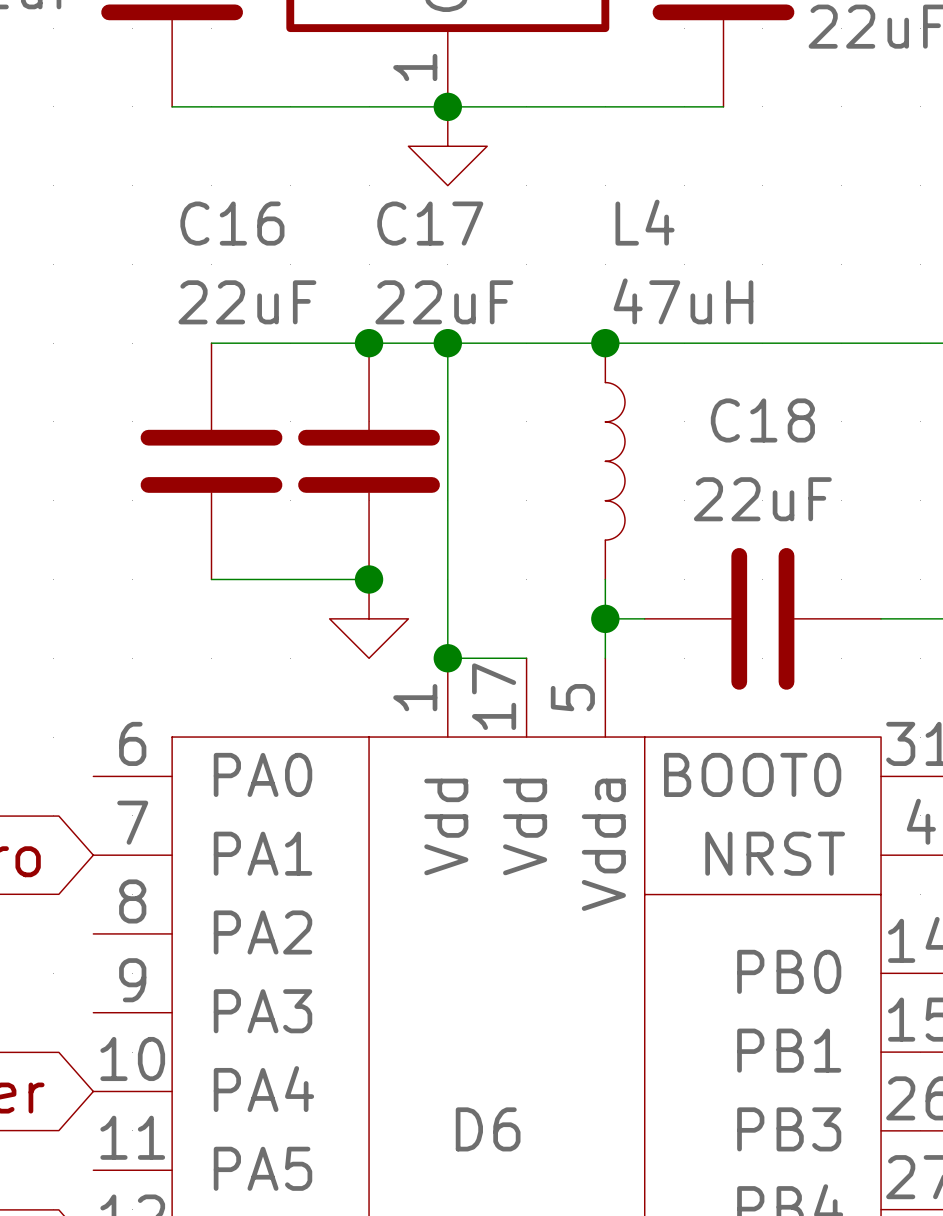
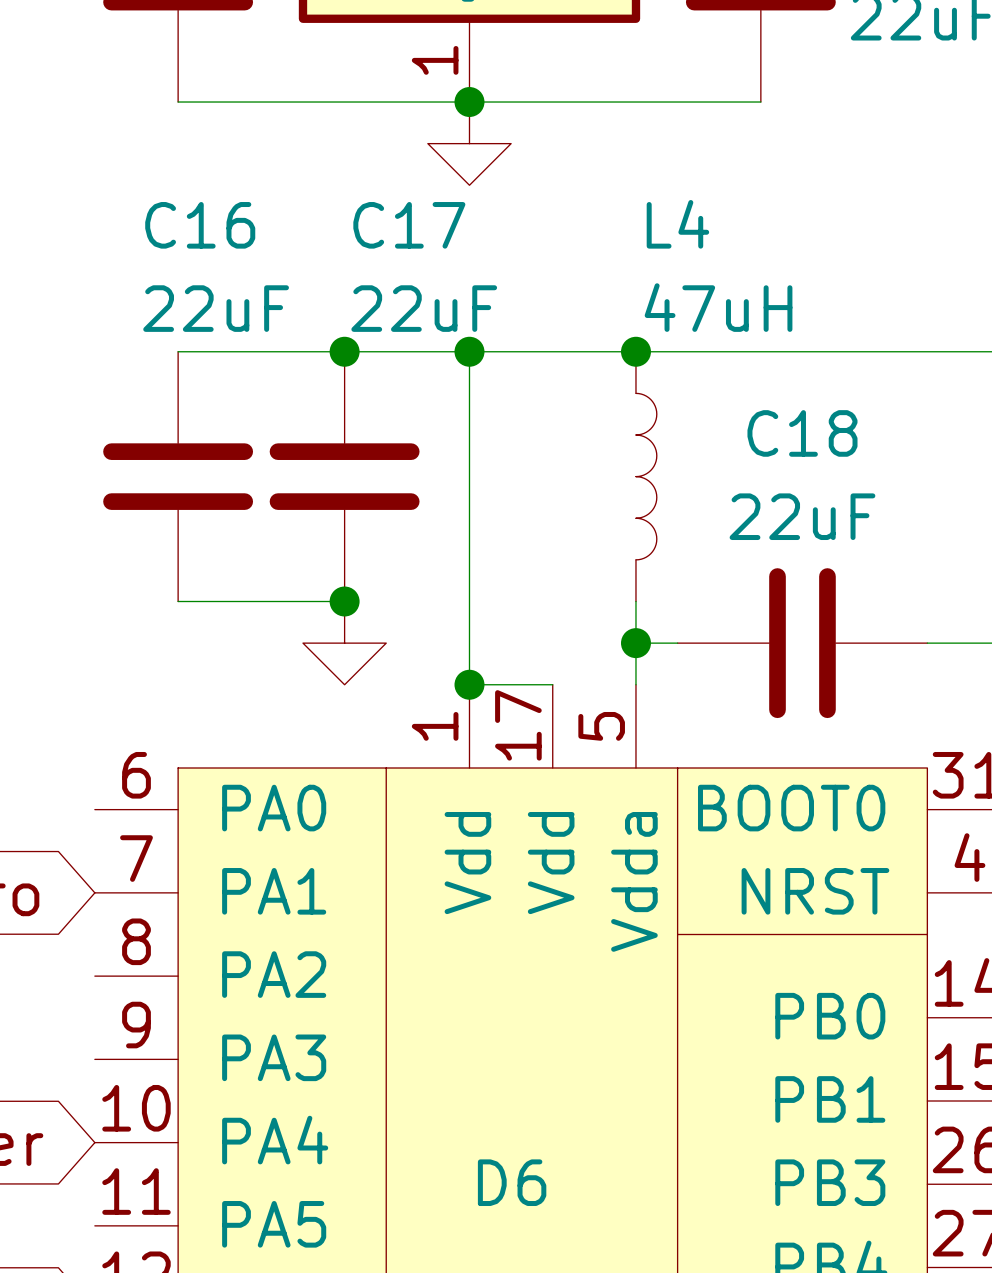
wire: none -> (178, 351) (219, 351)
junction position: (369, 343) -> (344, 351)
C16 position: (211, 461) -> (178, 476)
C17 position: (369, 461) -> (344, 476)
wire: (329, 579) (369, 579) -> (178, 601) (219, 601)
junction position: (369, 579) -> (344, 601)
power symbol position: (369, 618) -> (344, 643)

